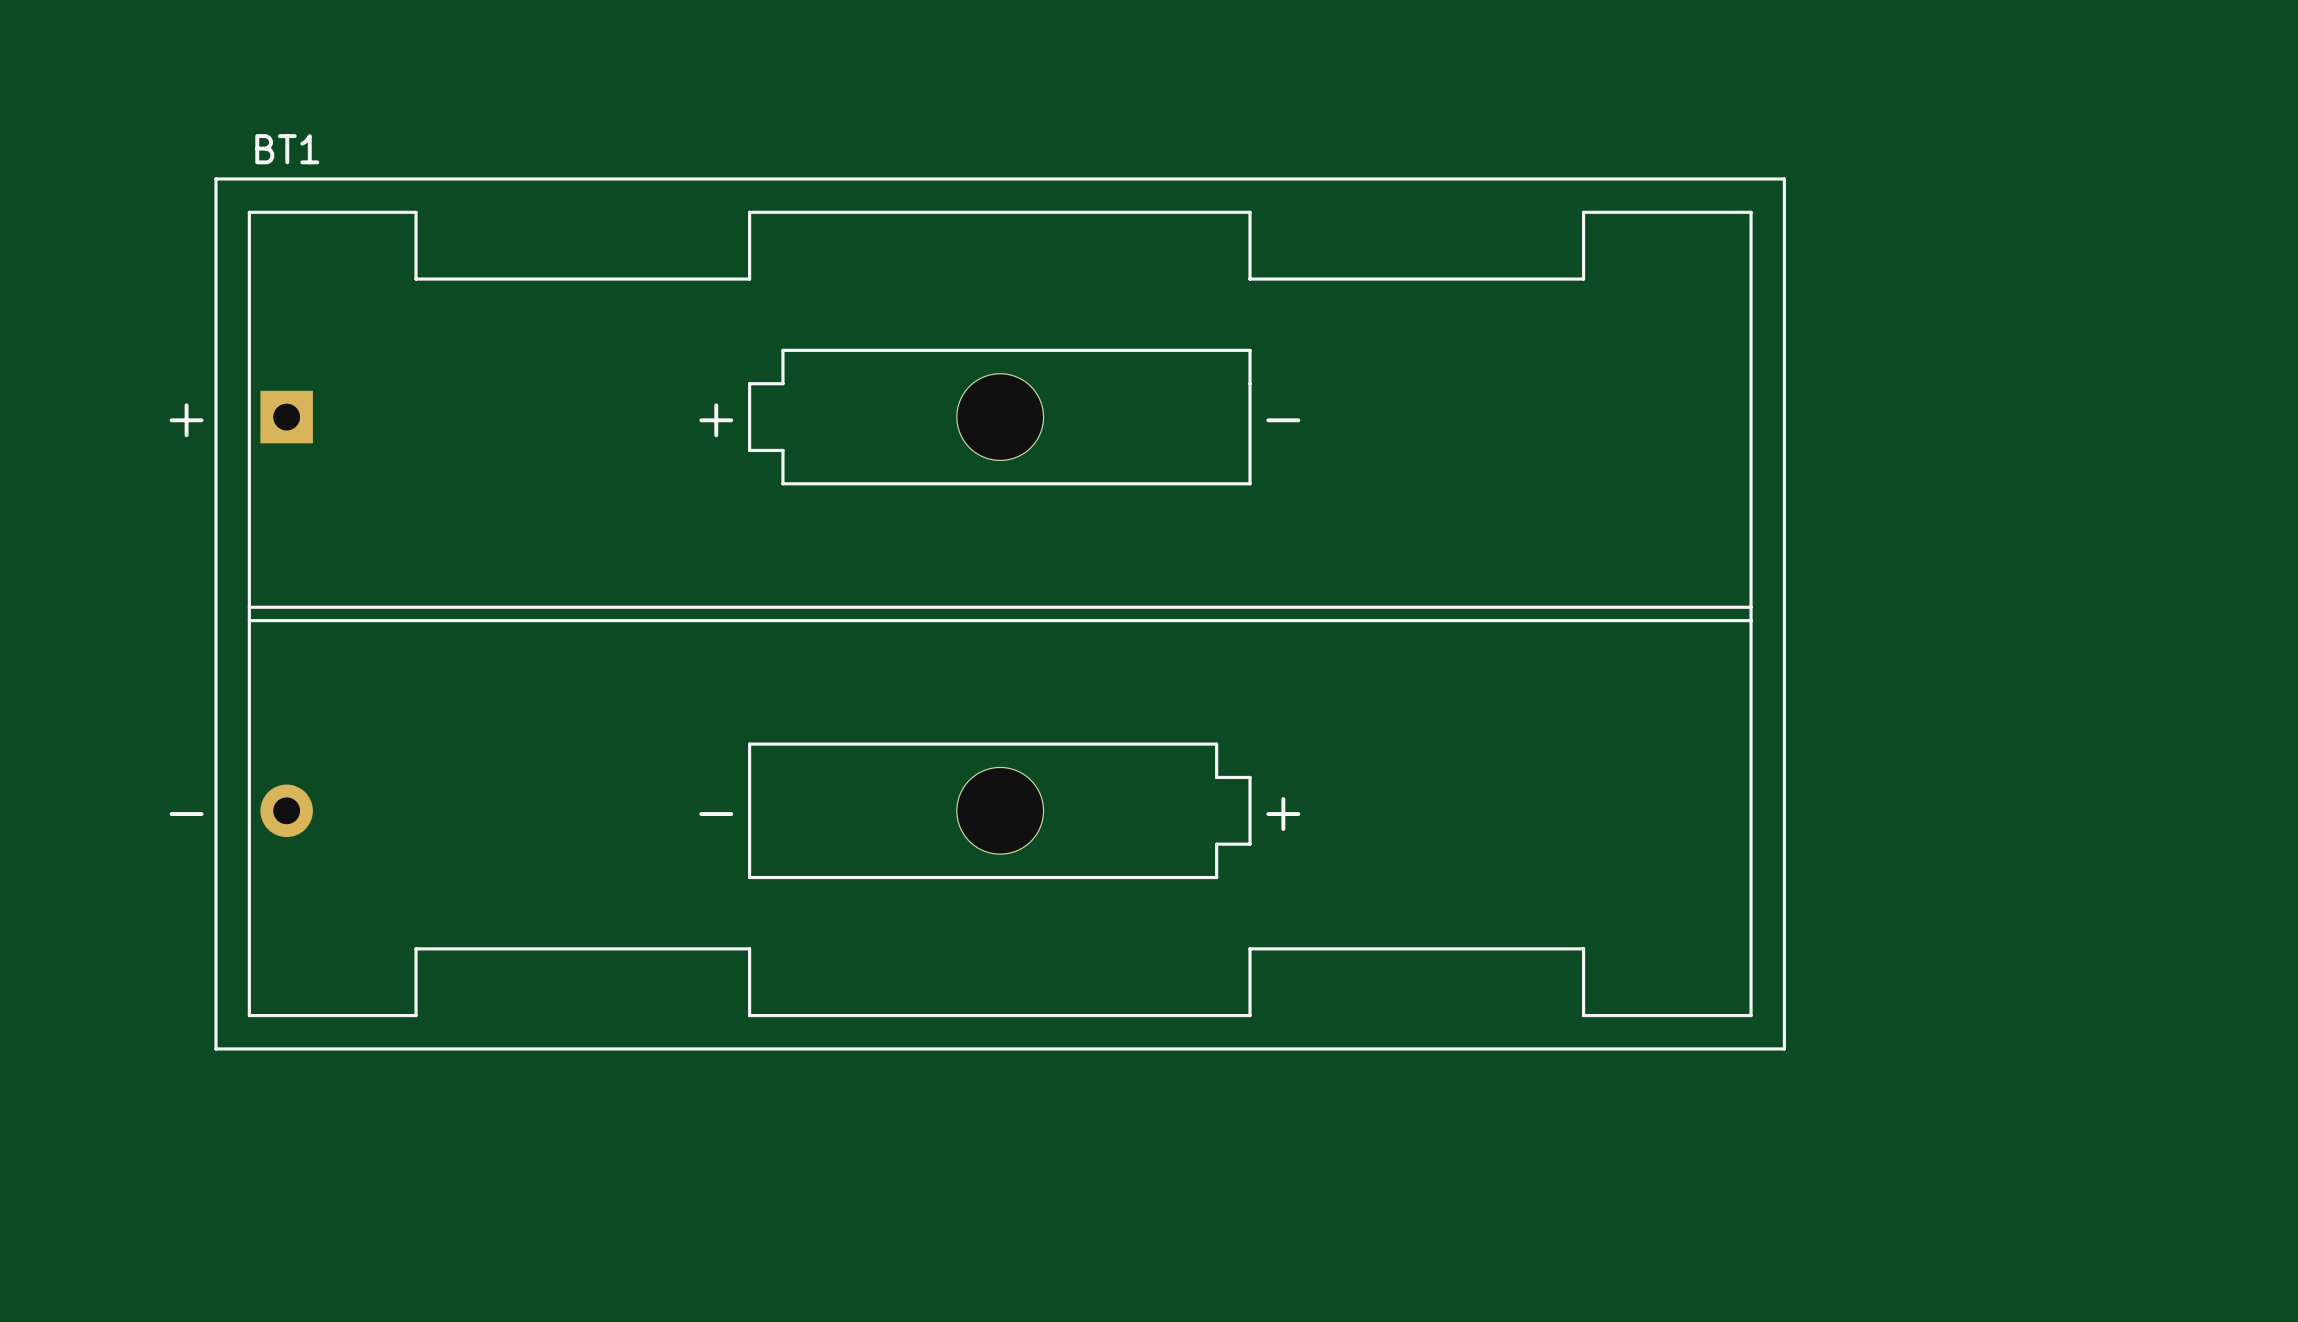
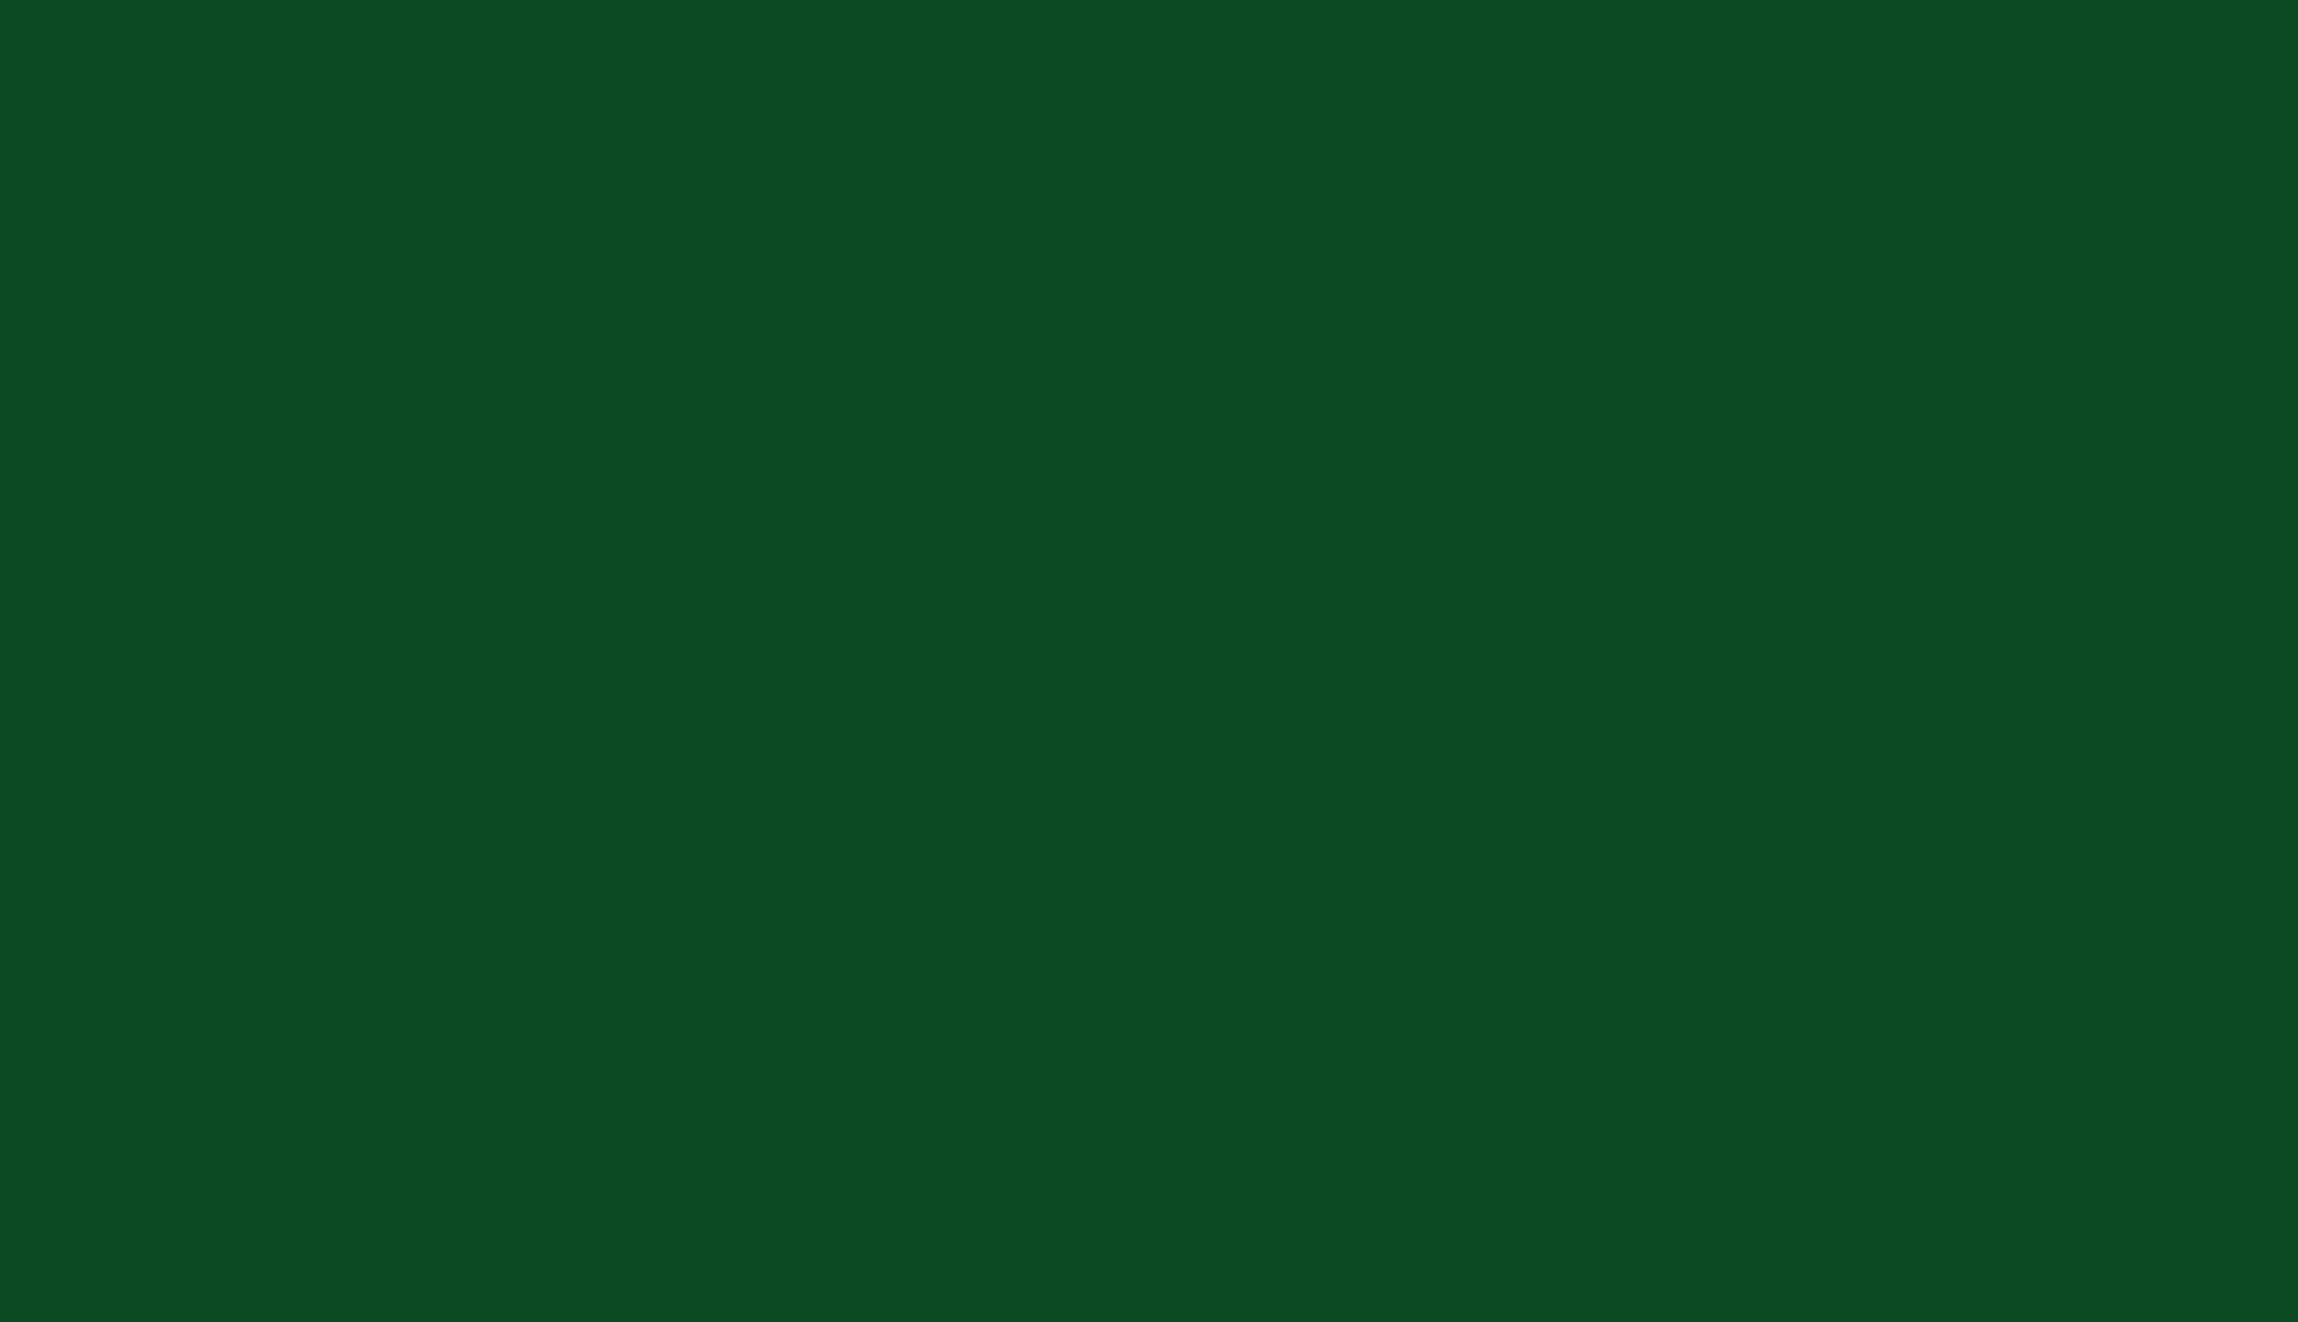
BT1: (1000, 613) -> none

